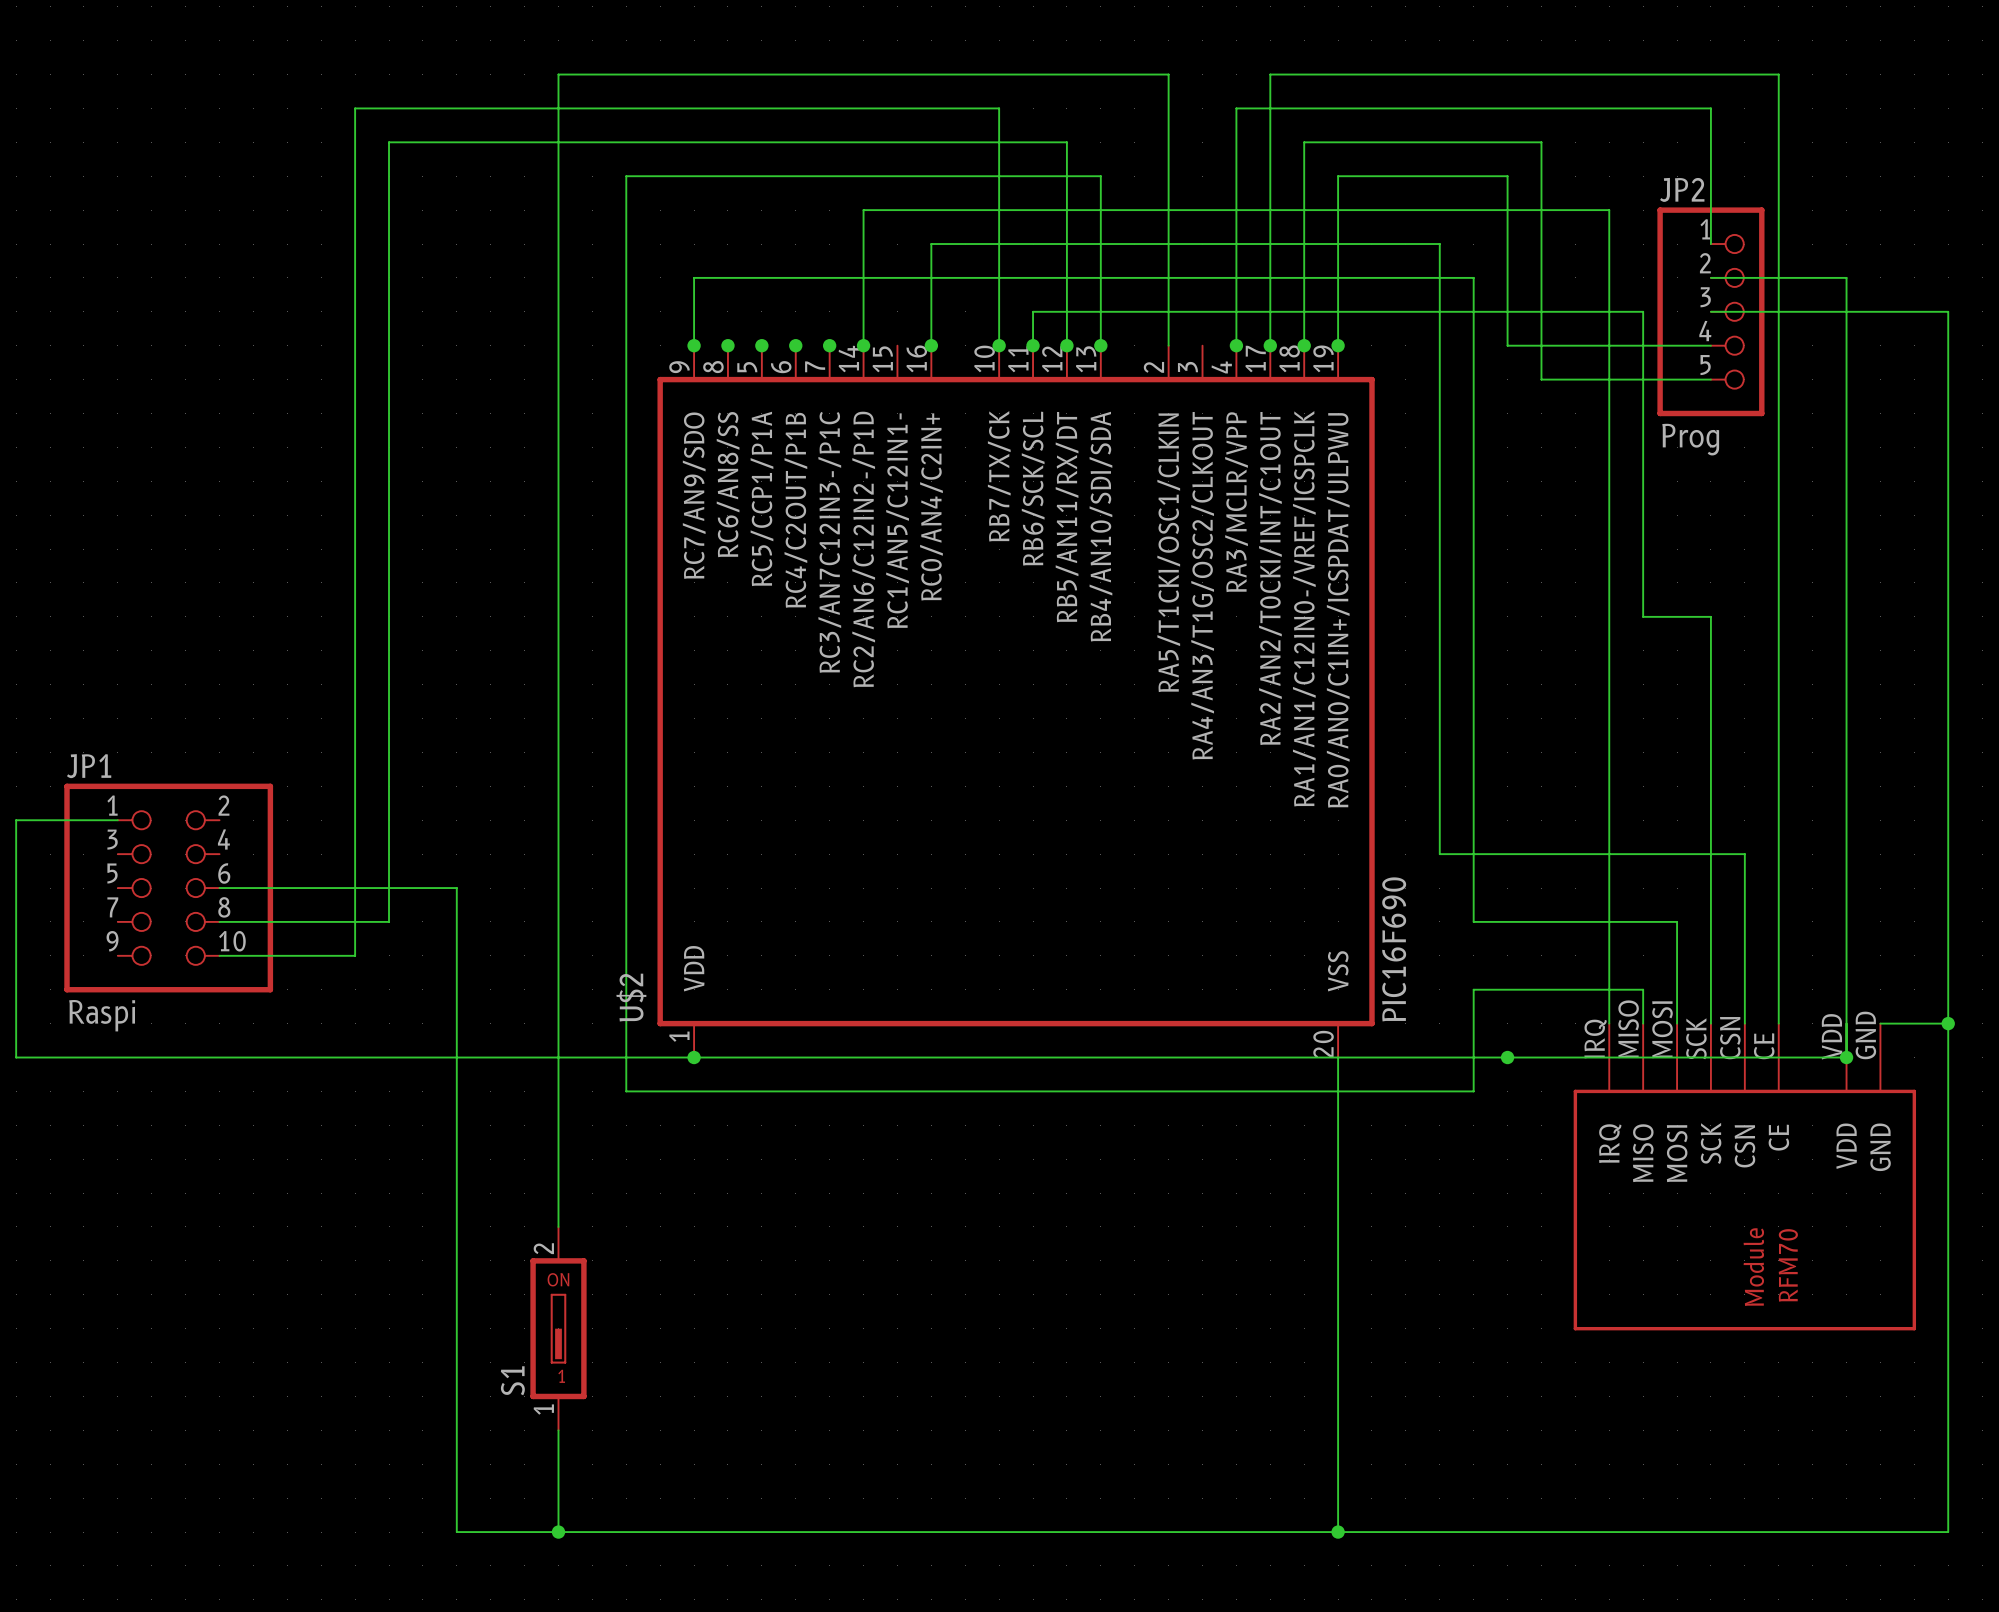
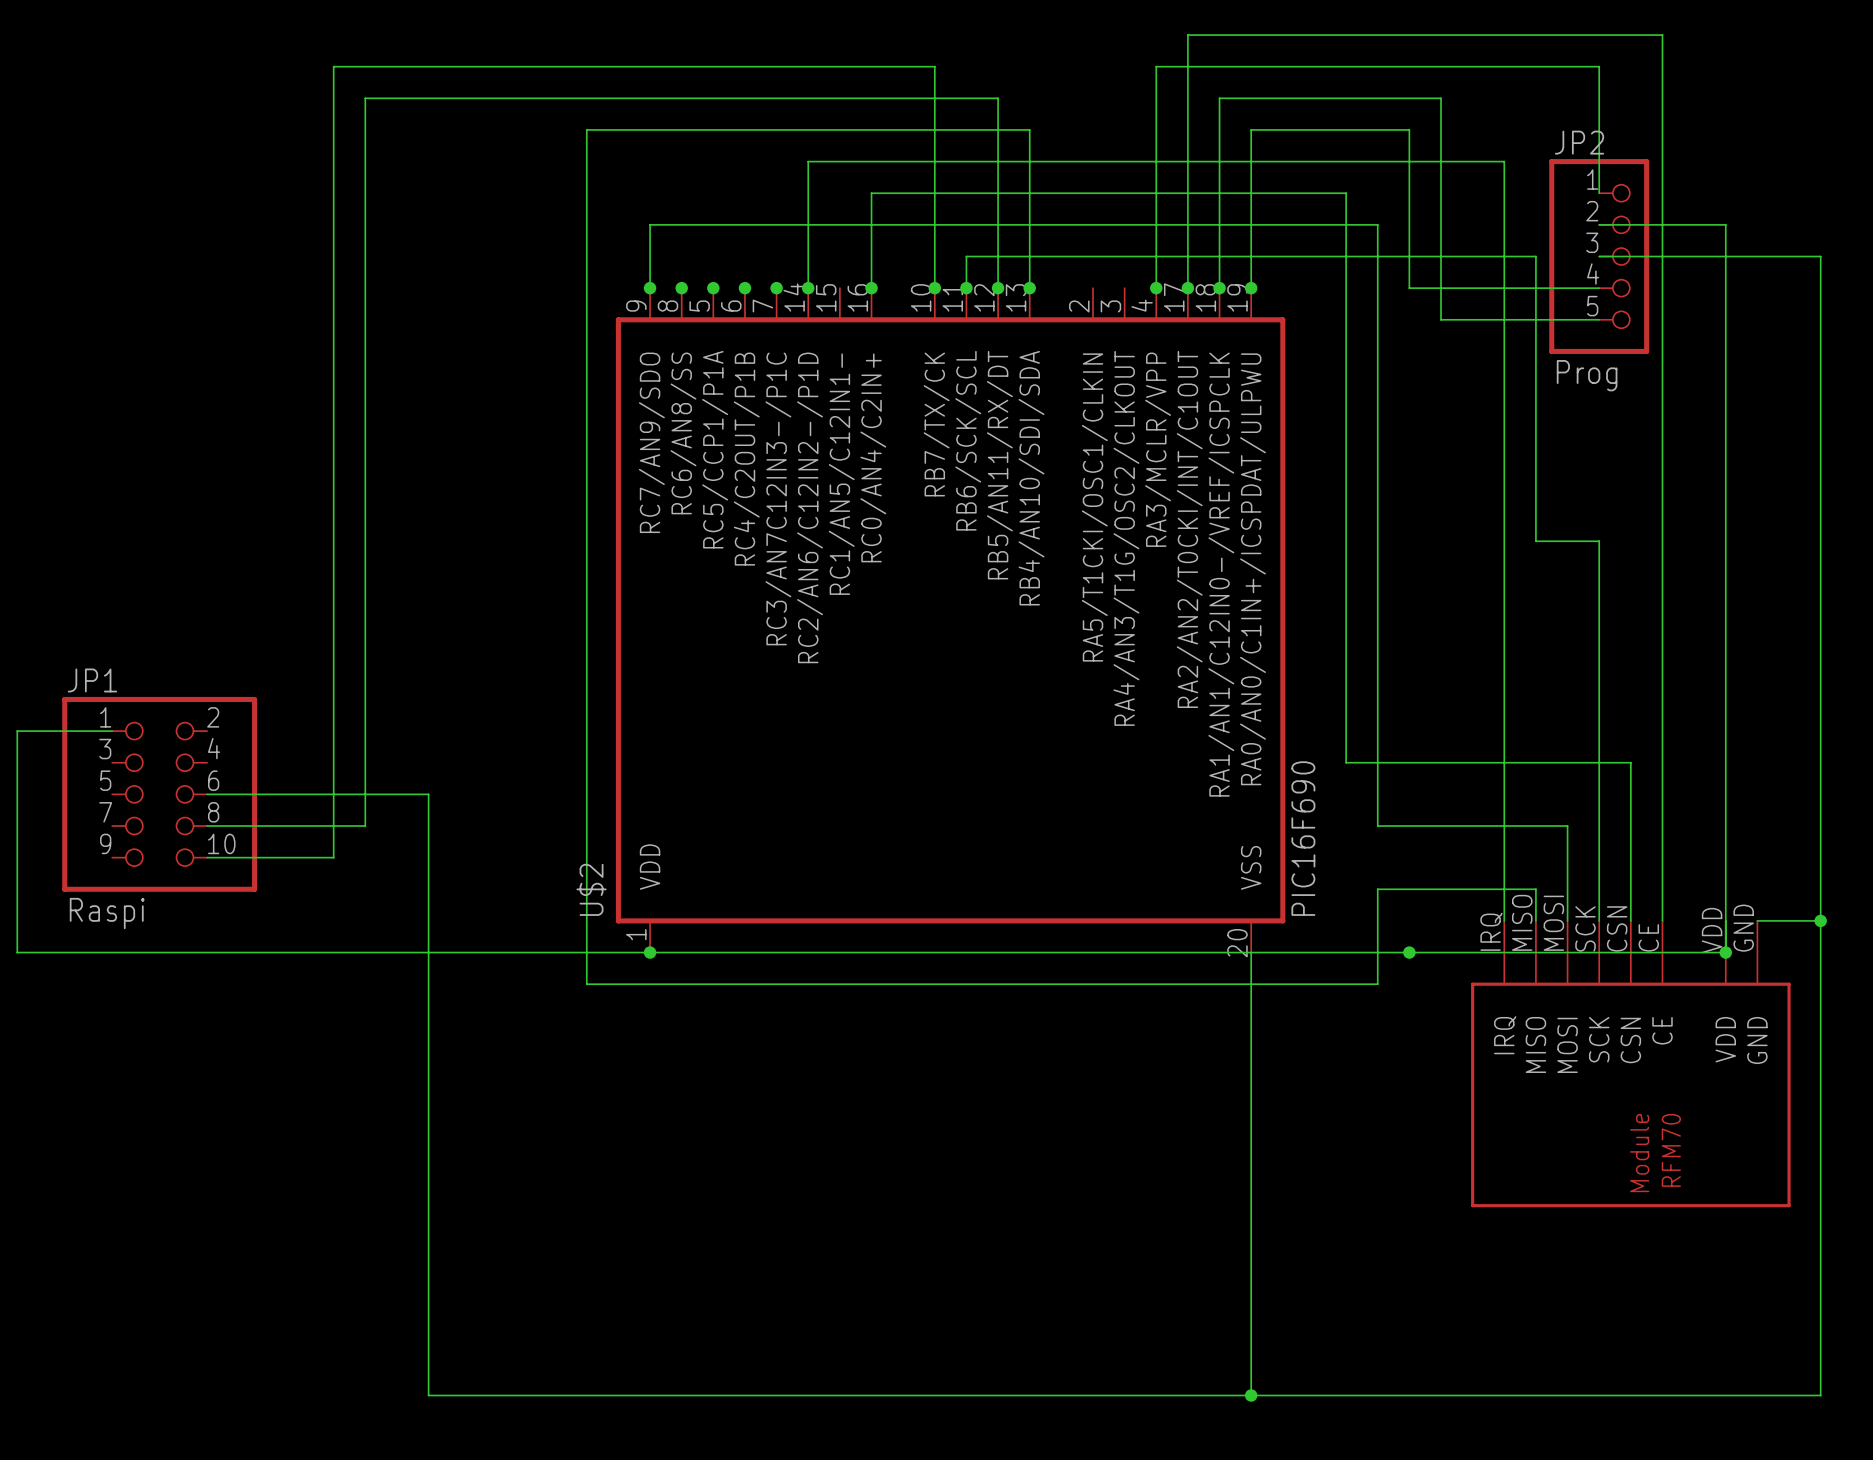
wire: (1168, 345) (1168, 74) (558, 74) (558, 1226) -> none
S1: (558, 1328) -> none
wire: (558, 1430) (558, 1532) -> none
junction: (558, 1532) -> none

